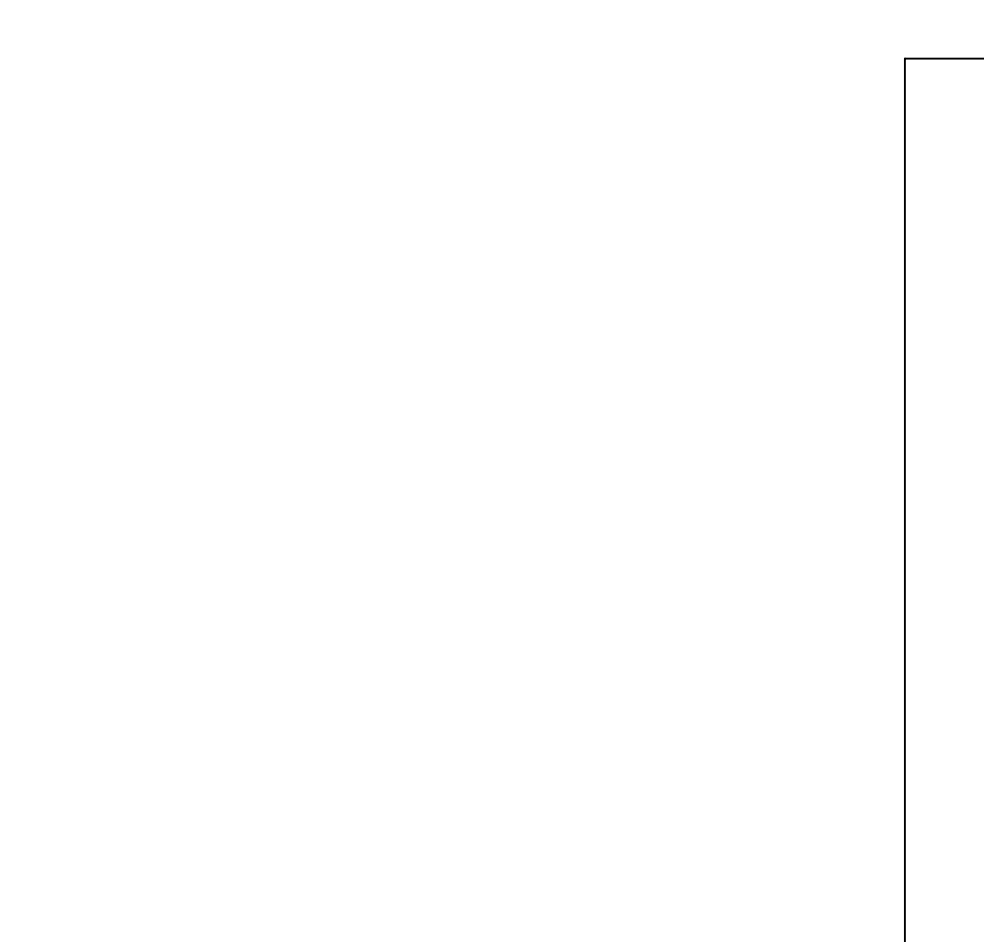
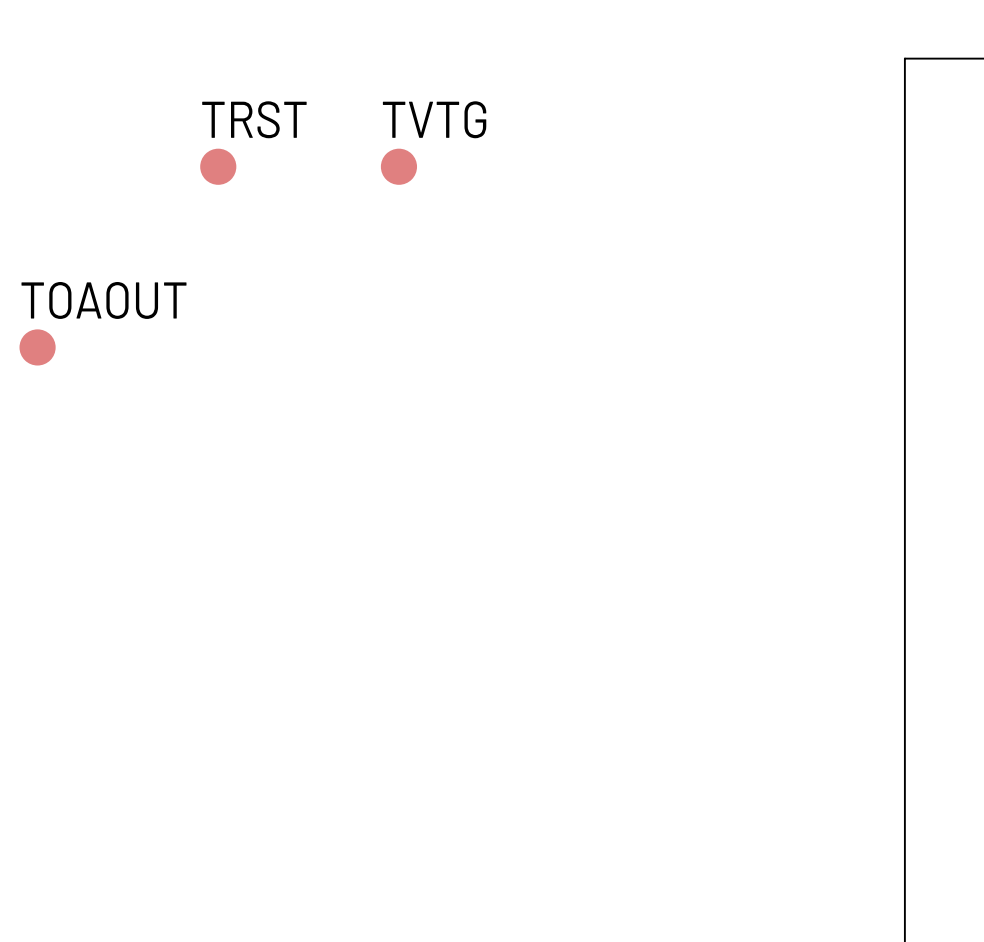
TRST: none -> (218, 166)
TVTG: none -> (398, 166)
TOAOUT: none -> (37, 347)

